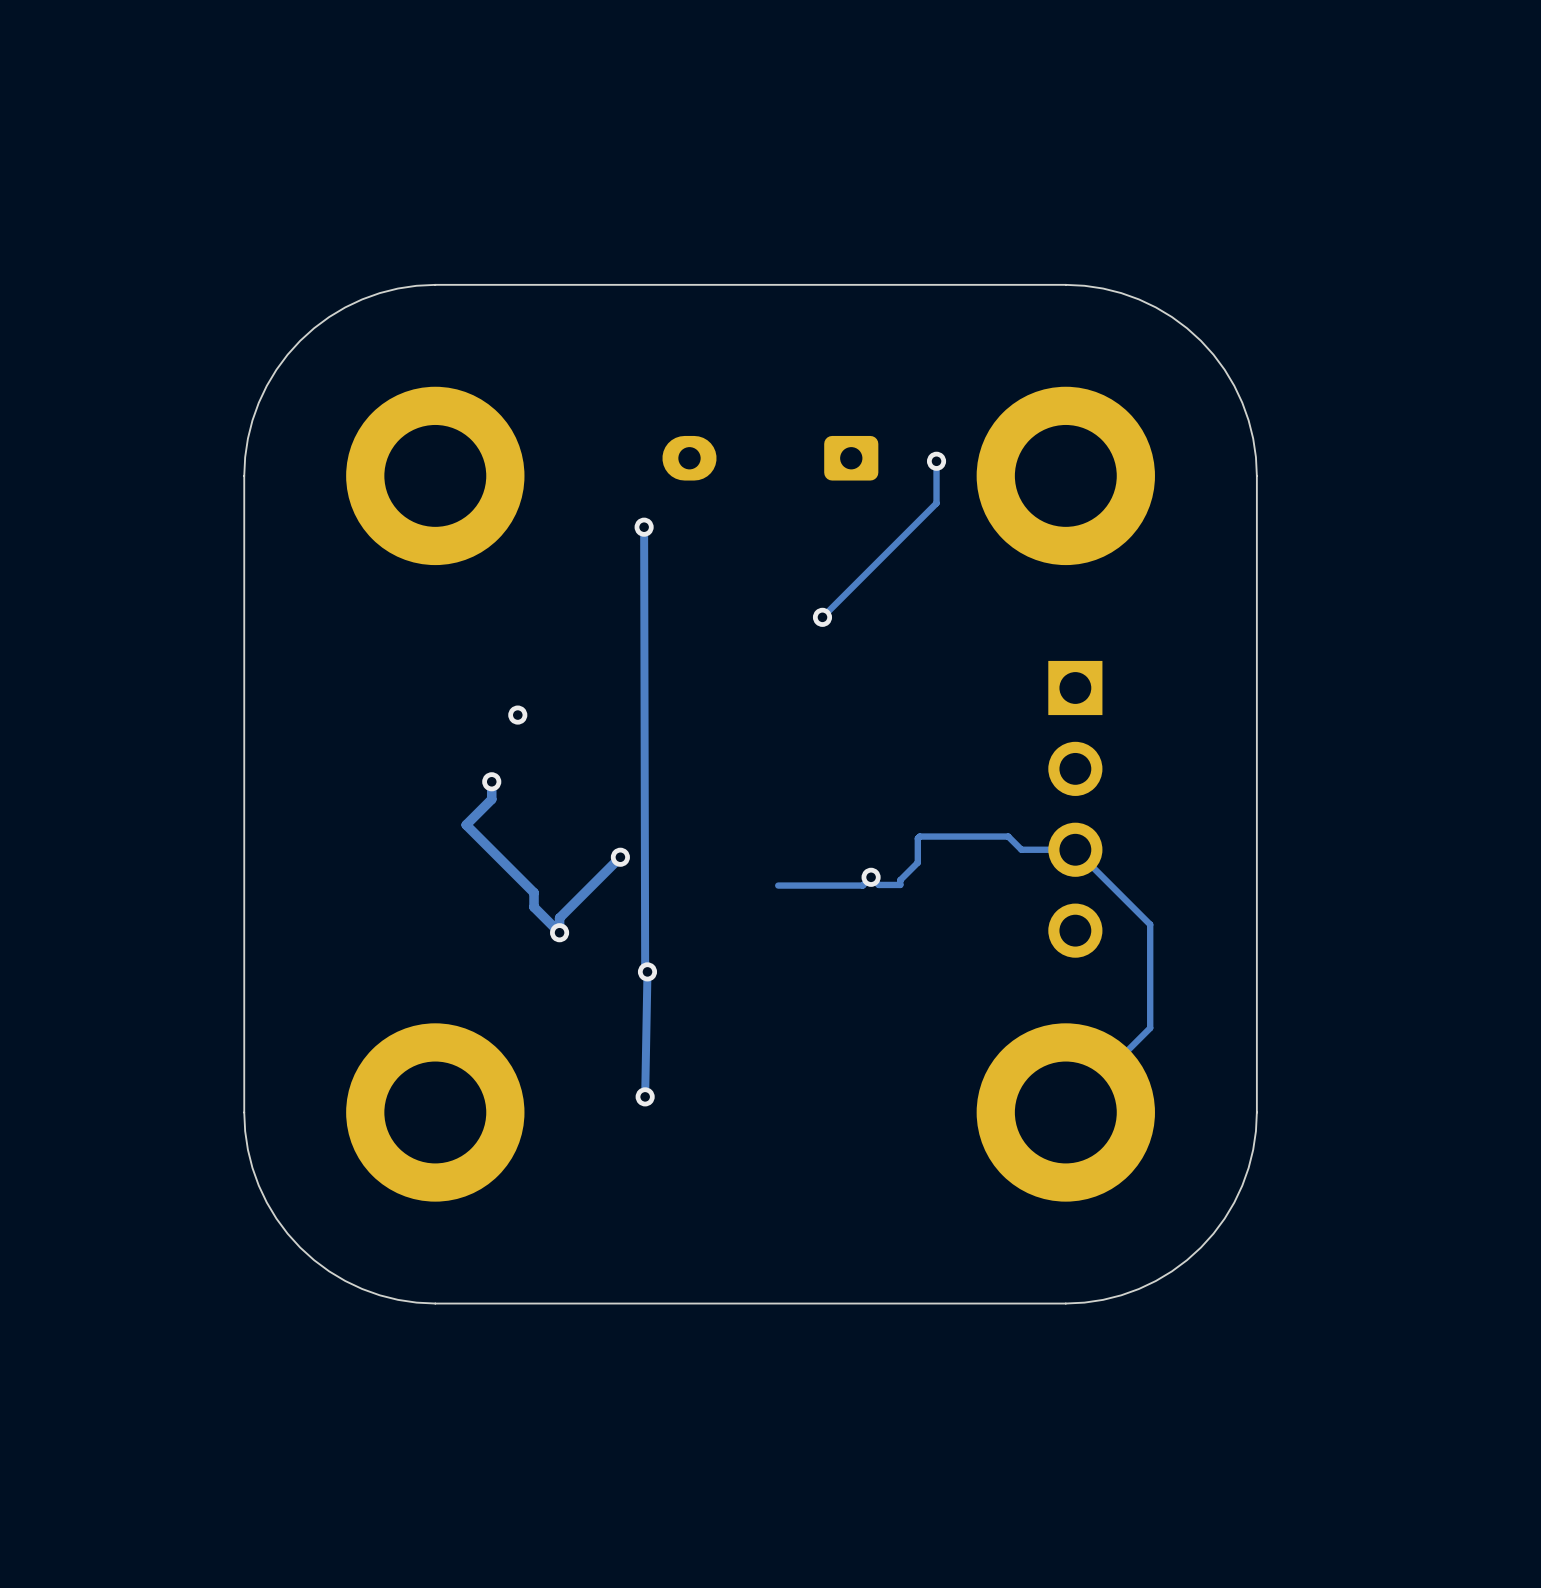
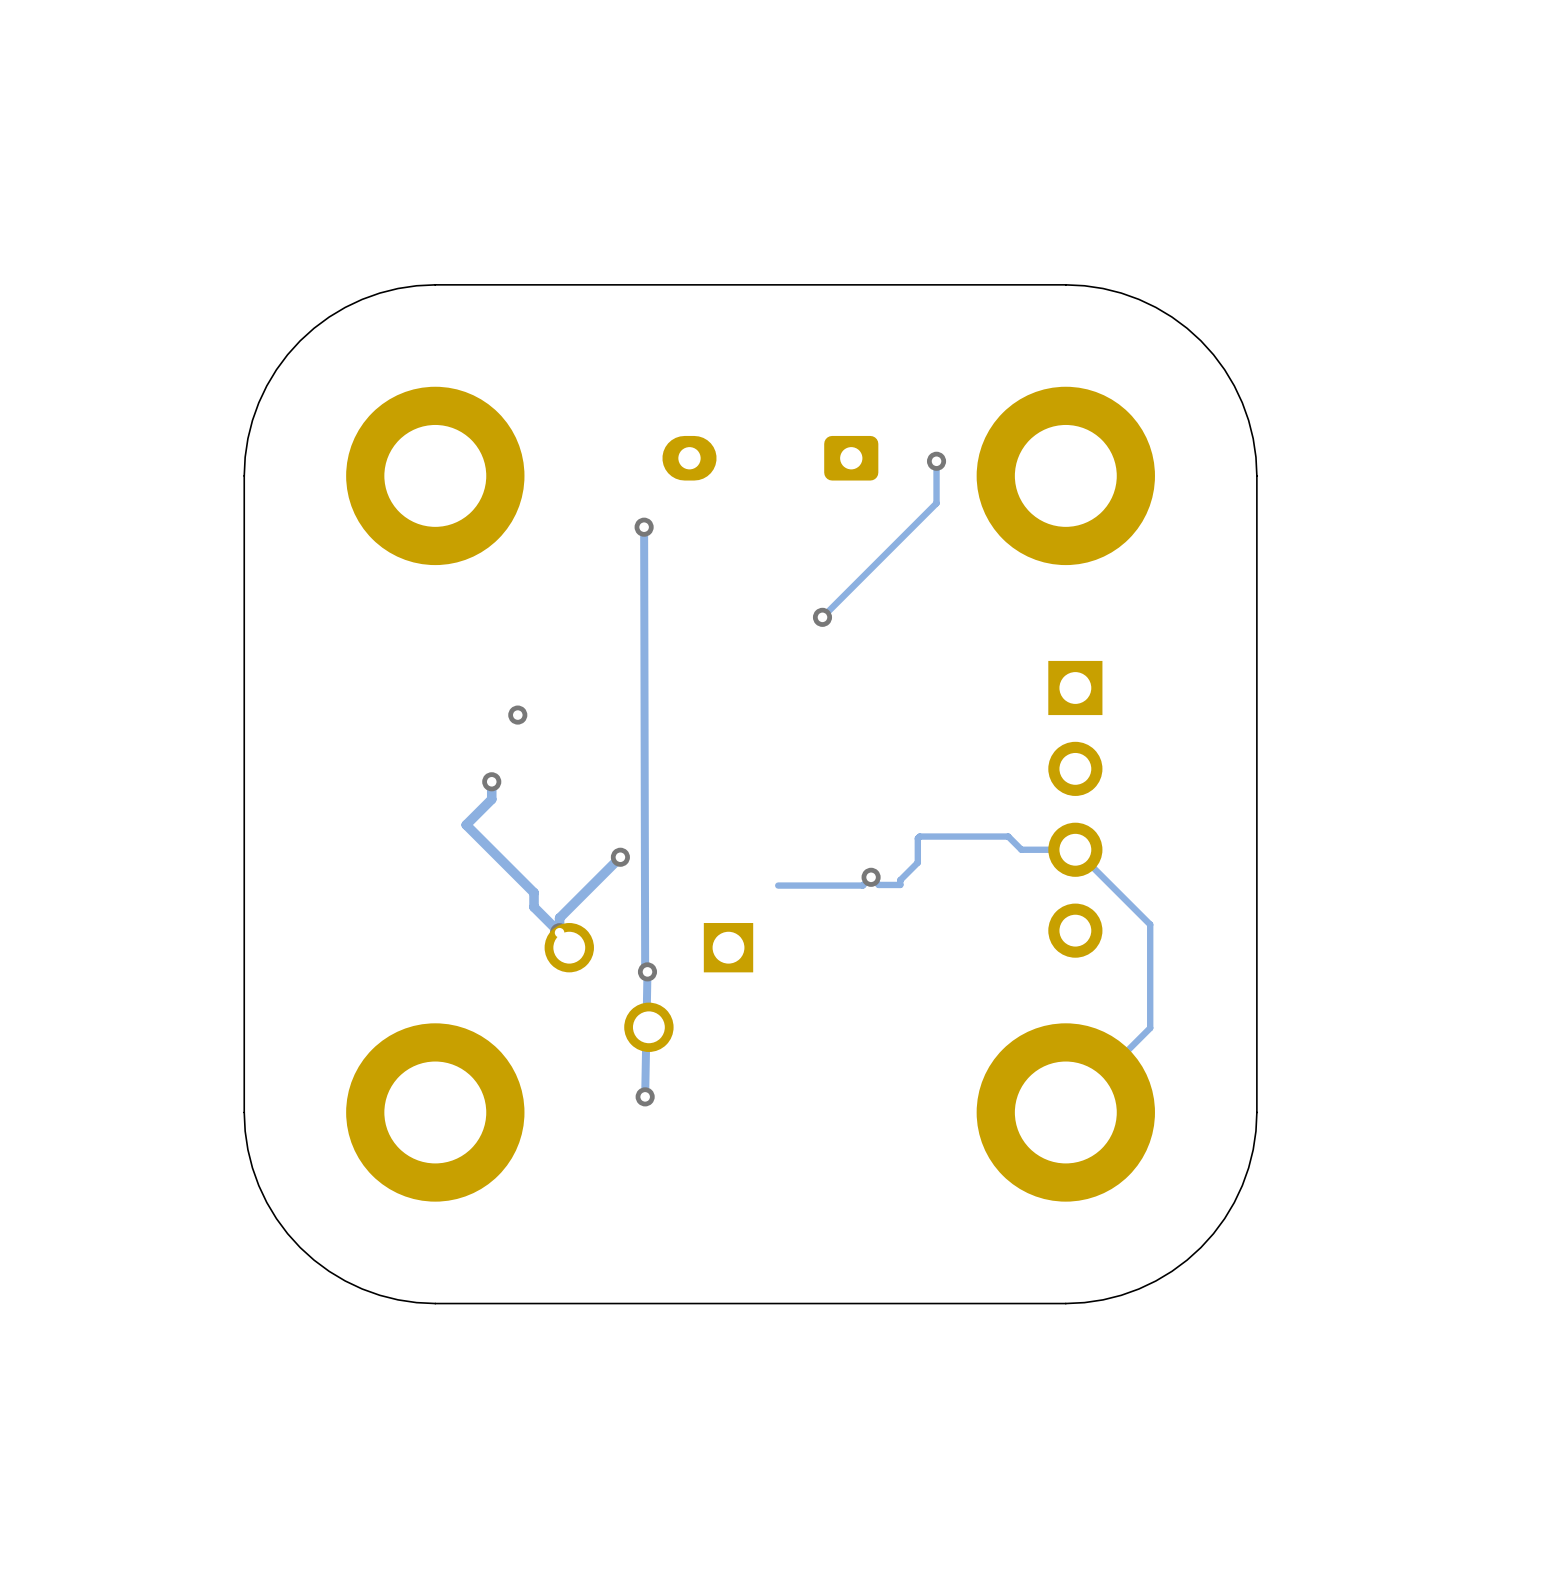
part: none -> (648, 987)

